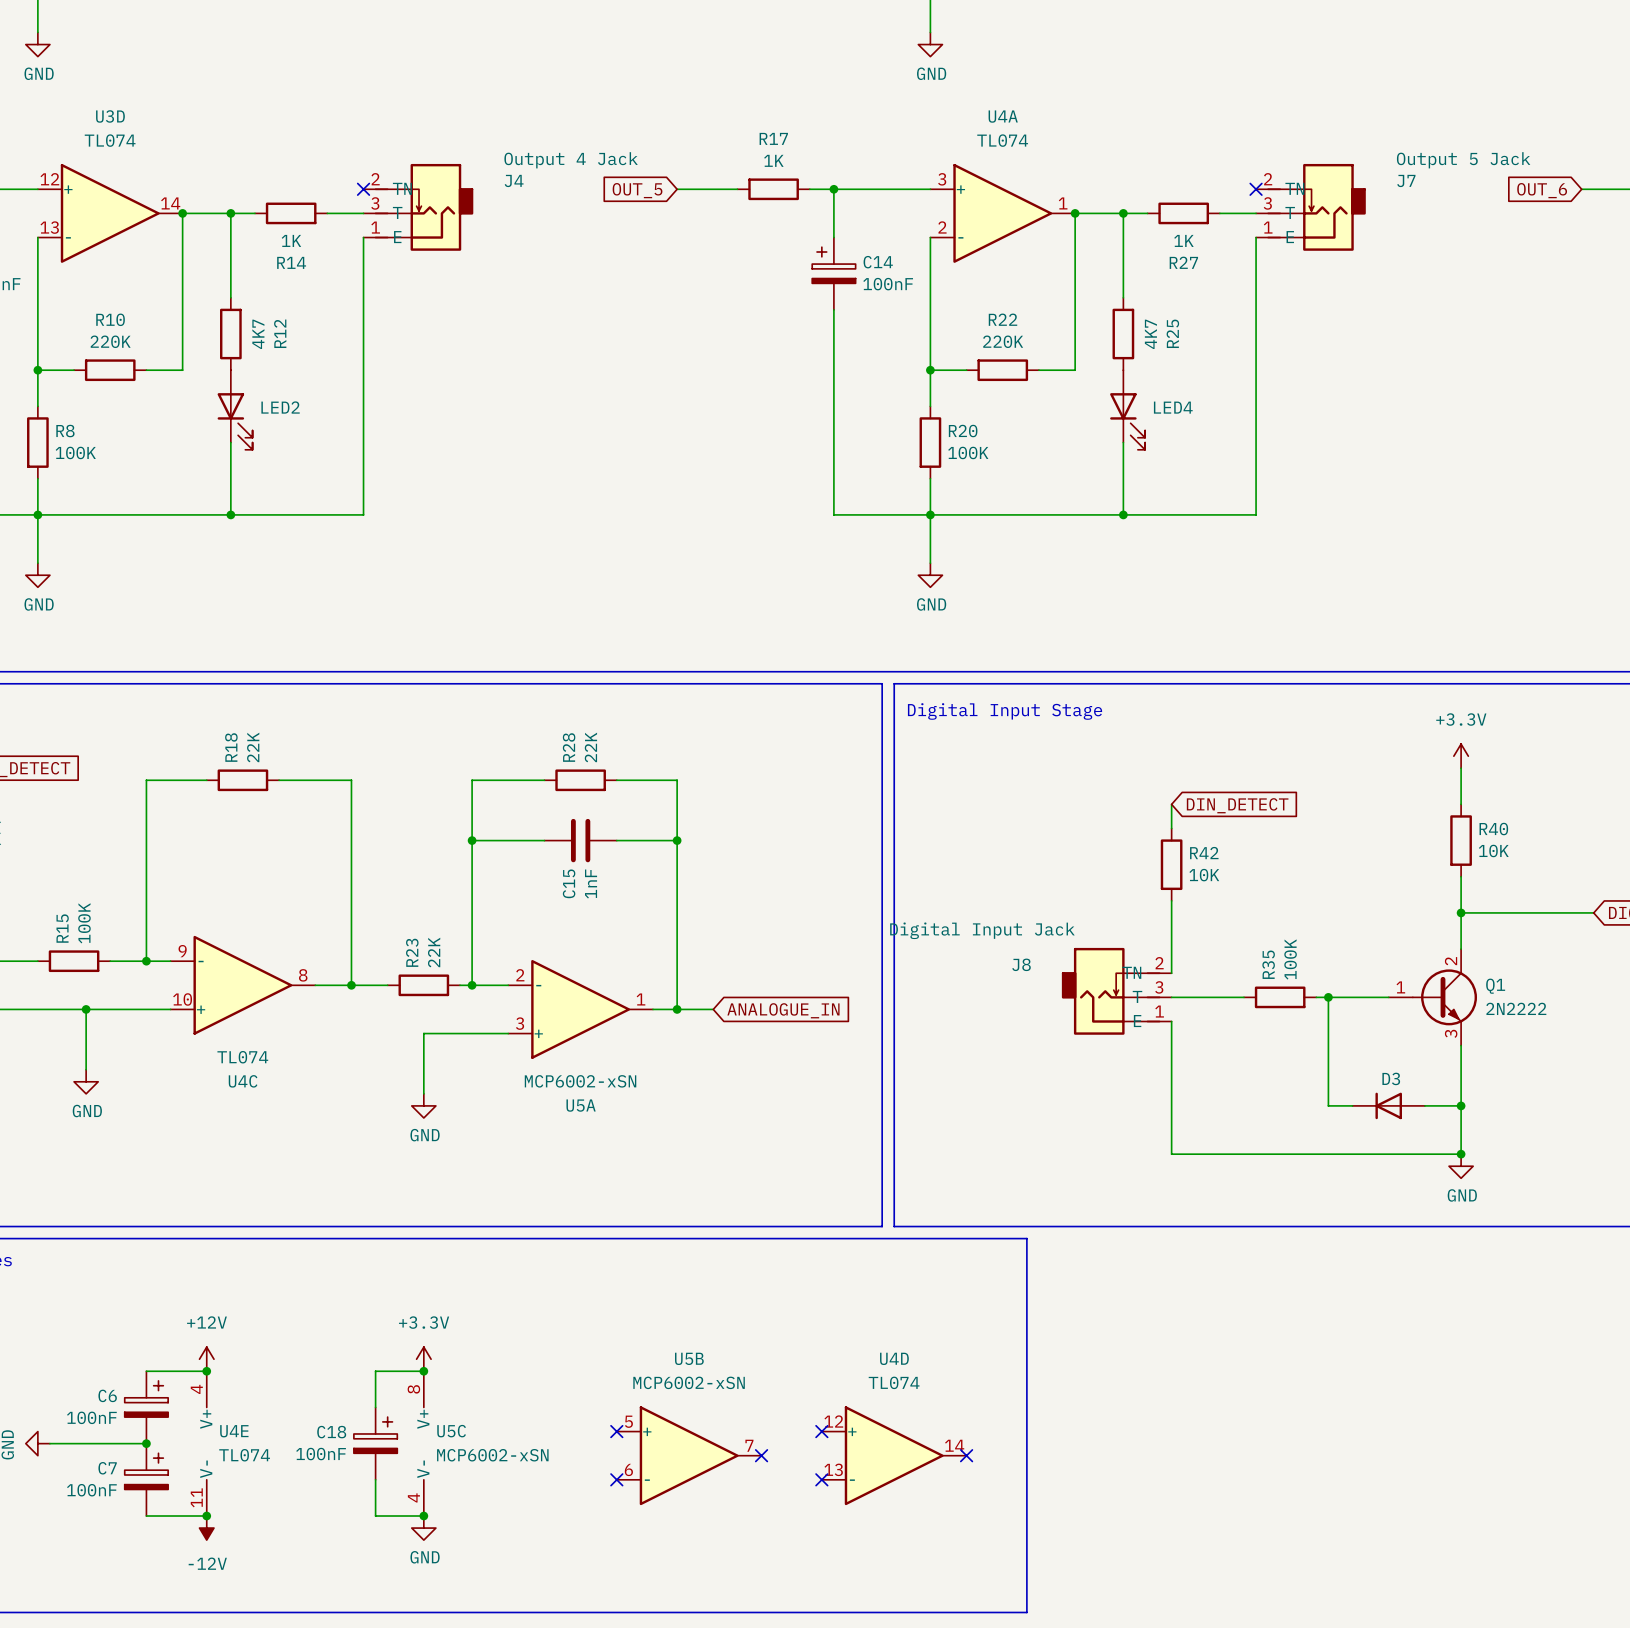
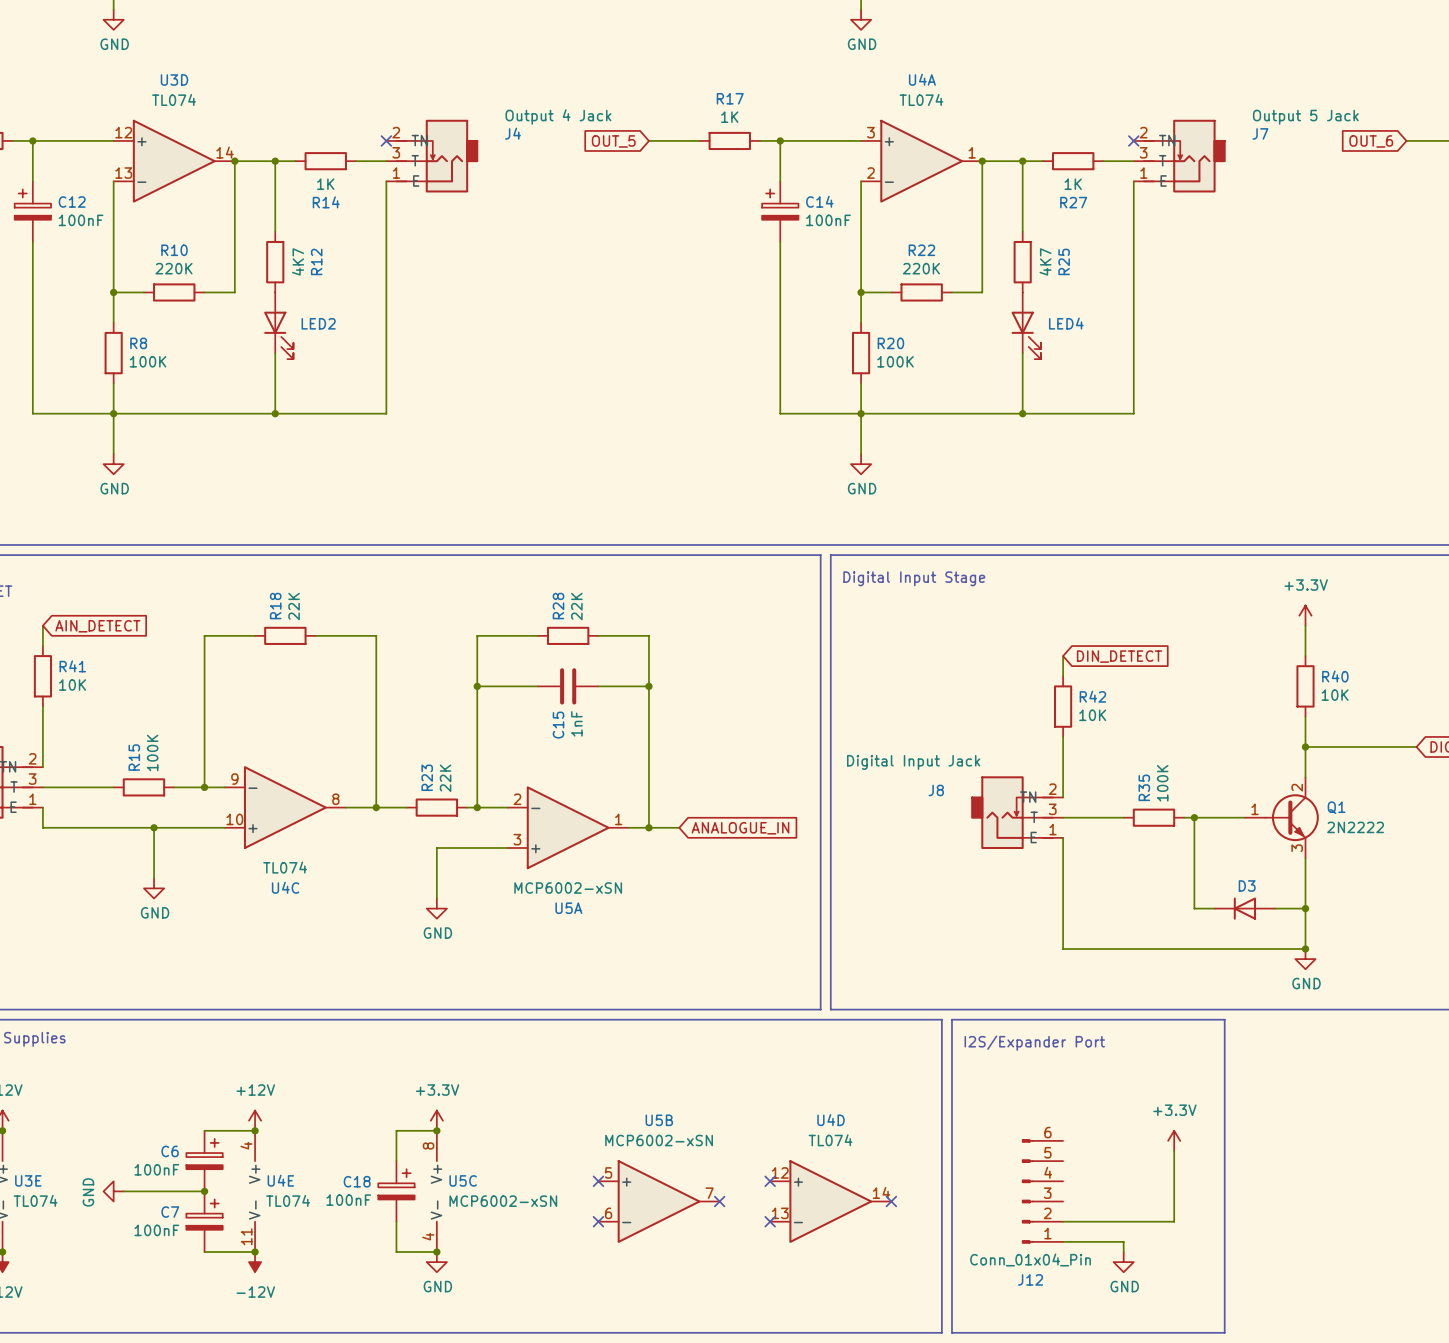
line: none -> (951, 1019) (1224, 1019) (1224, 1332) (951, 1332) (951, 1019)
text: none -> I2S/Expander Port (1034, 1043)
power symbol: none -> +3.3V (1174, 1140)
wire: none -> (1174, 1151) (1174, 1221) (1063, 1221)
J12: none -> Conn_01x04_Pin (1042, 1191)
wire: none -> (1063, 1241) (1123, 1241) (1123, 1252)
power symbol: none -> GND (1123, 1262)

